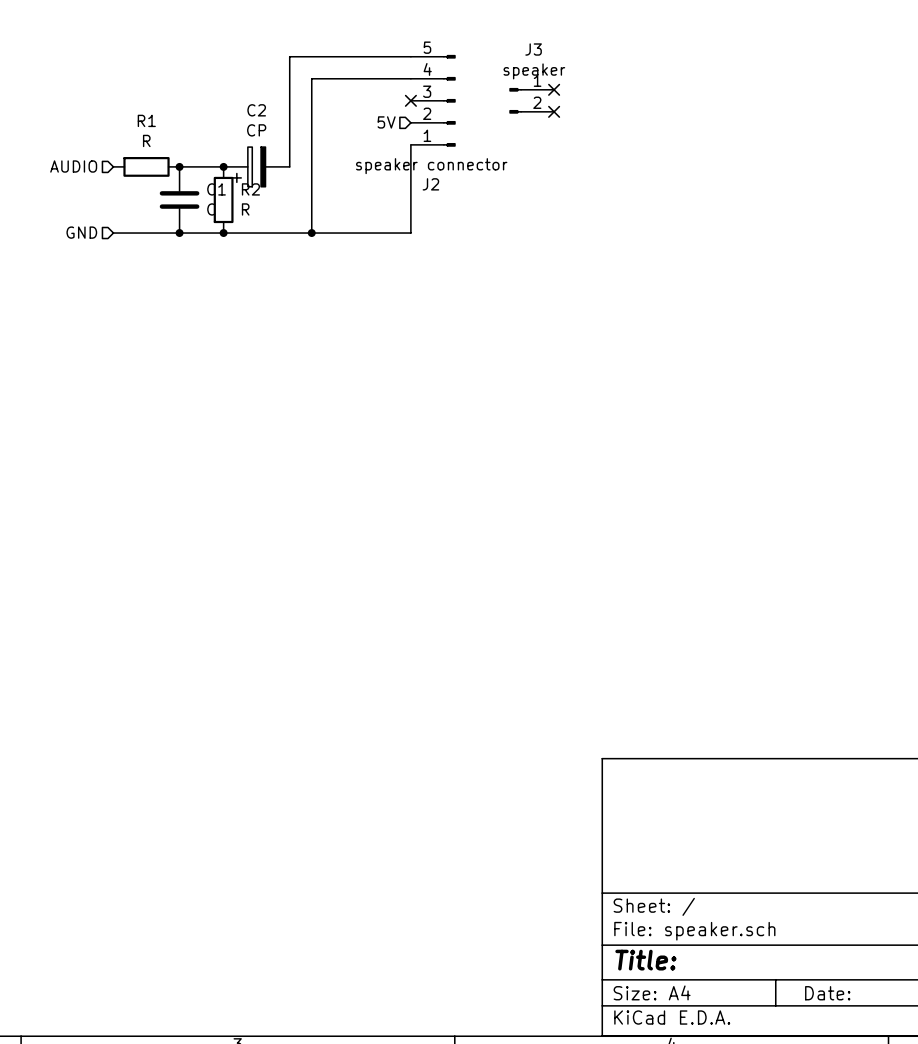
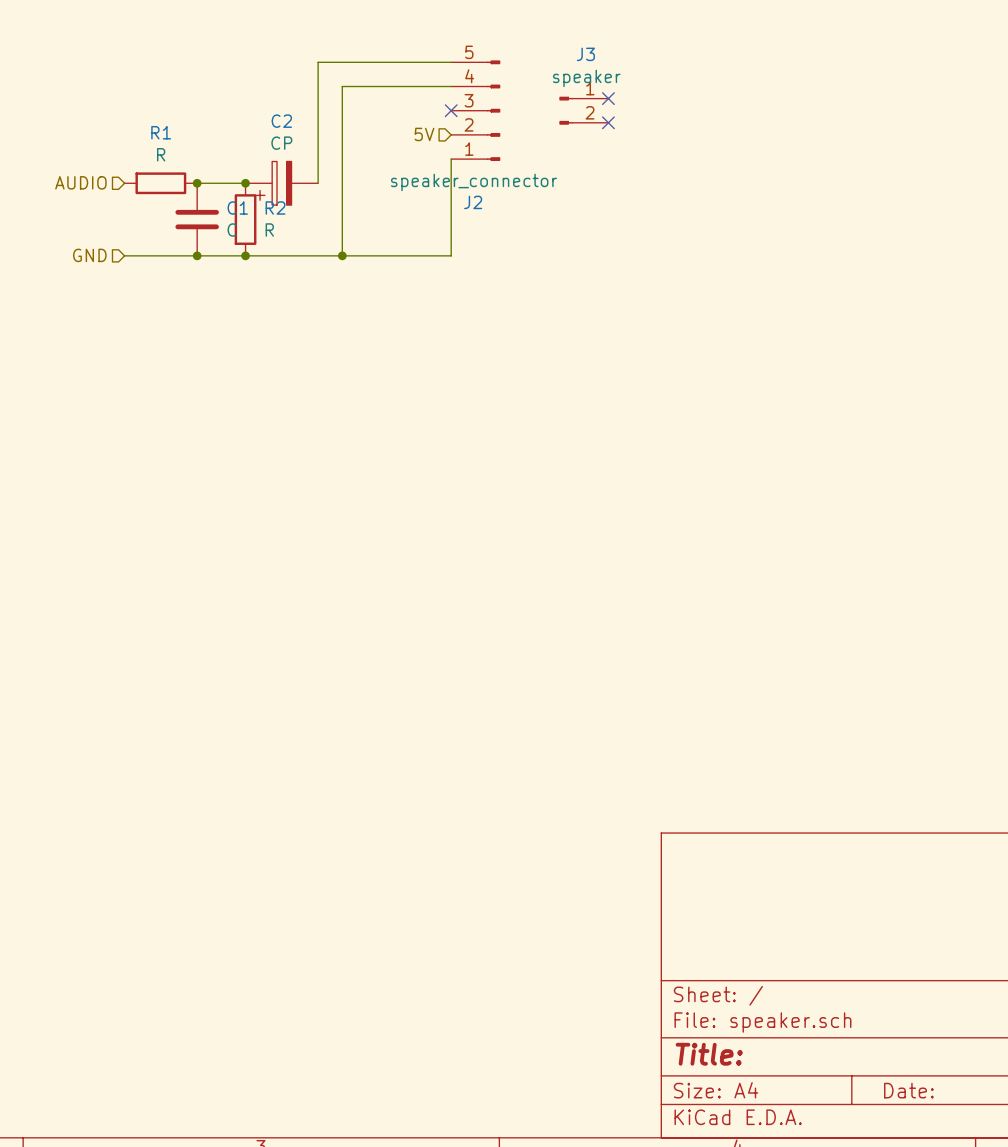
J2 value: speaker connector (431, 166) -> speaker_connector (474, 182)

